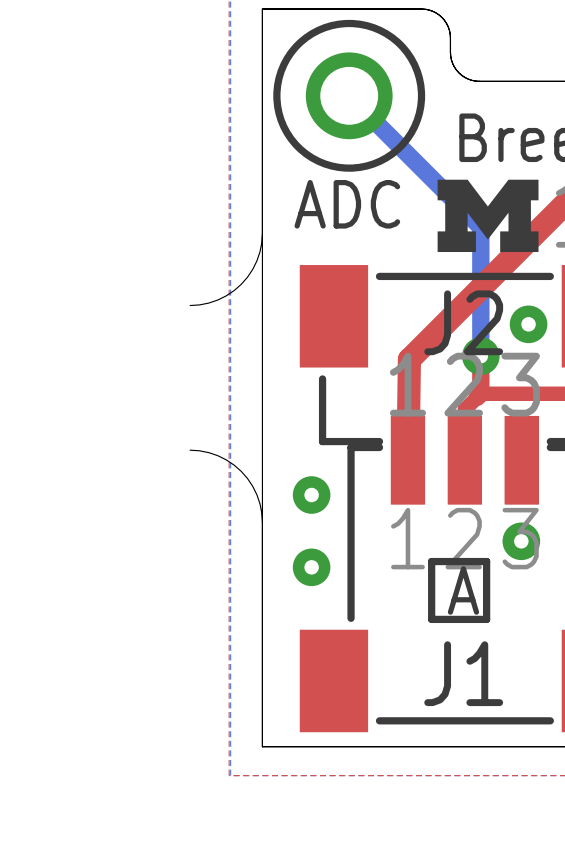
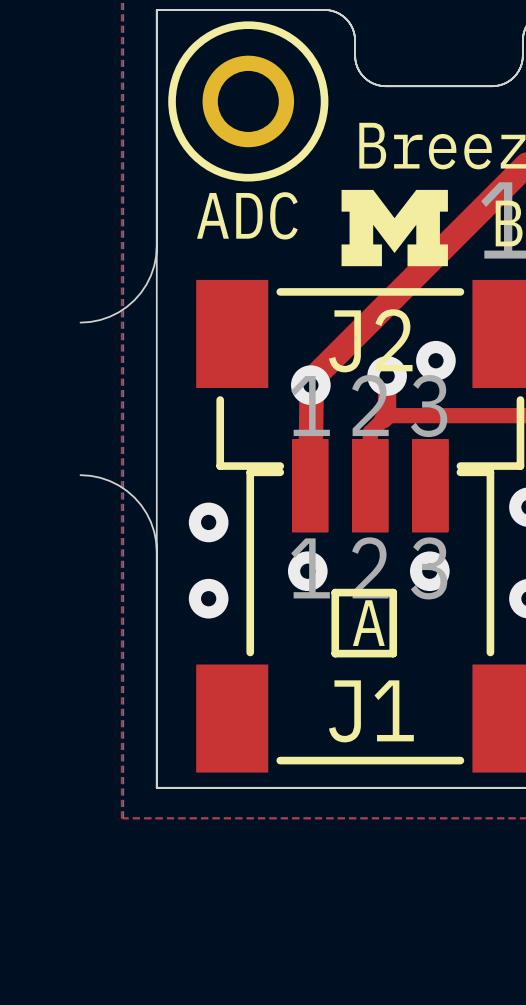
bottom track: (349, 95) (480, 227) (480, 356) -> none
via position: (528, 324) -> (435, 360)
via: none -> (310, 385)
via: none -> (307, 571)

